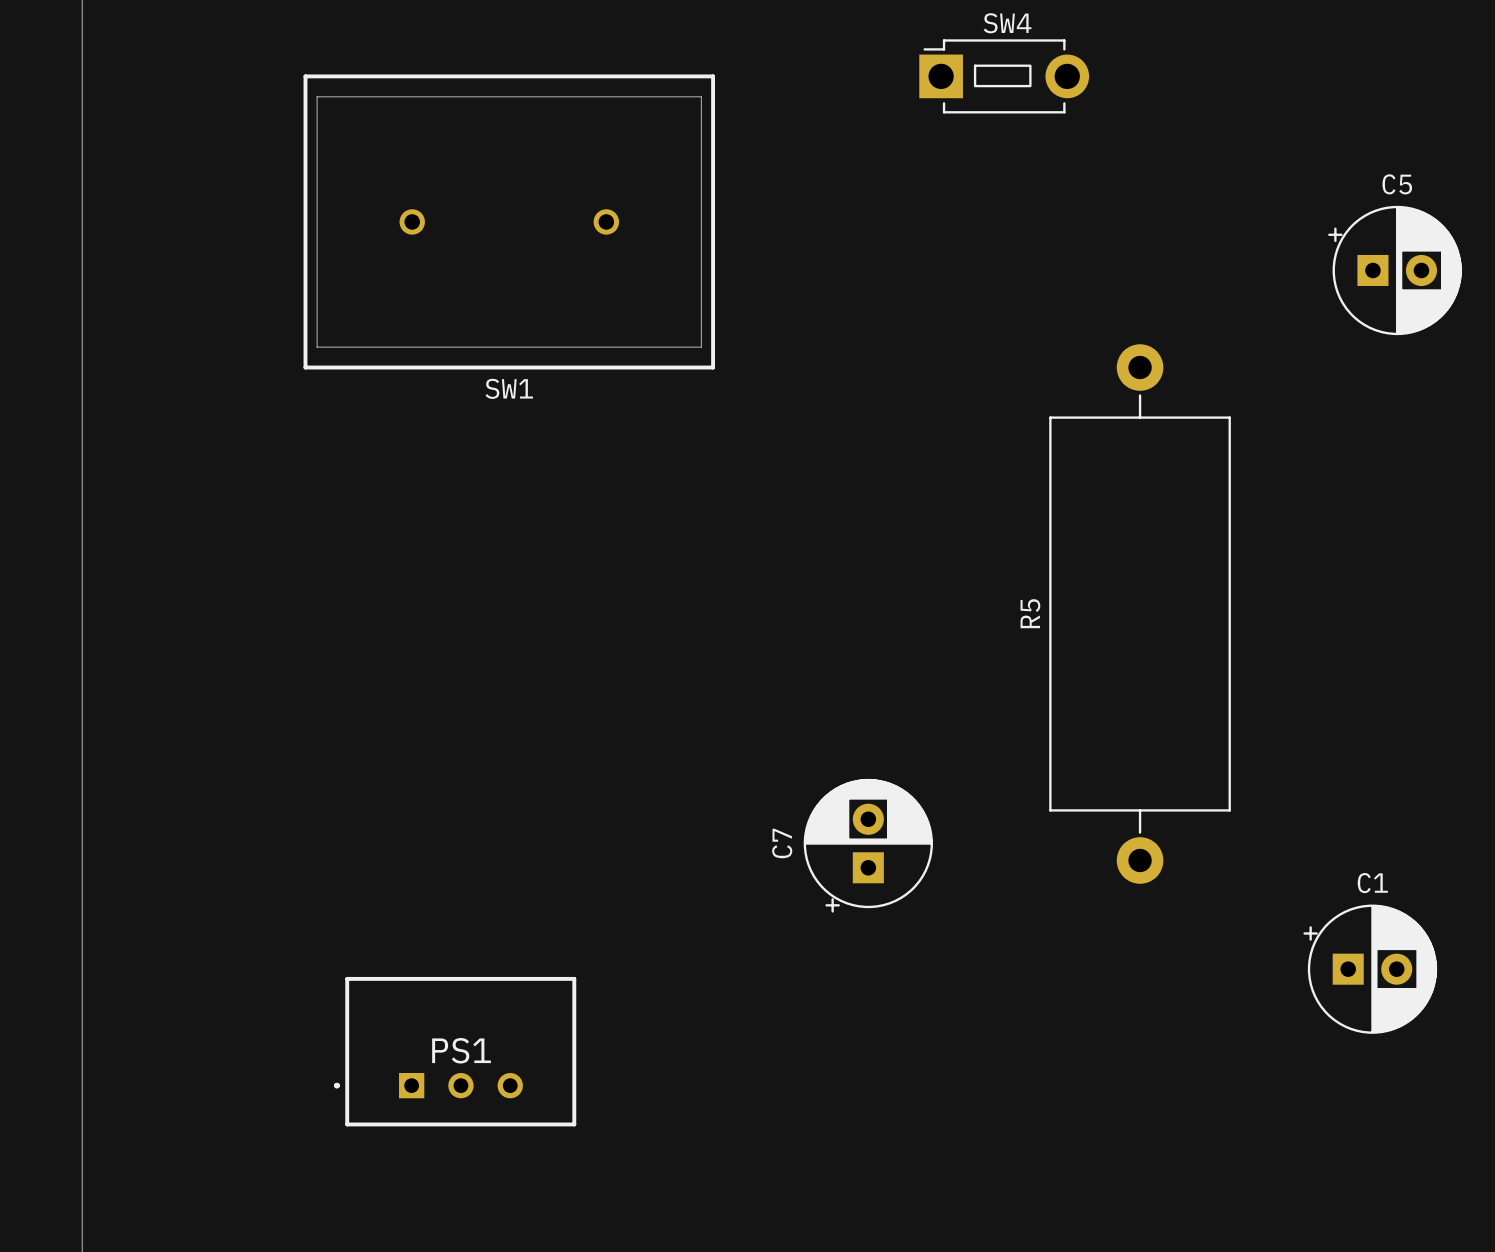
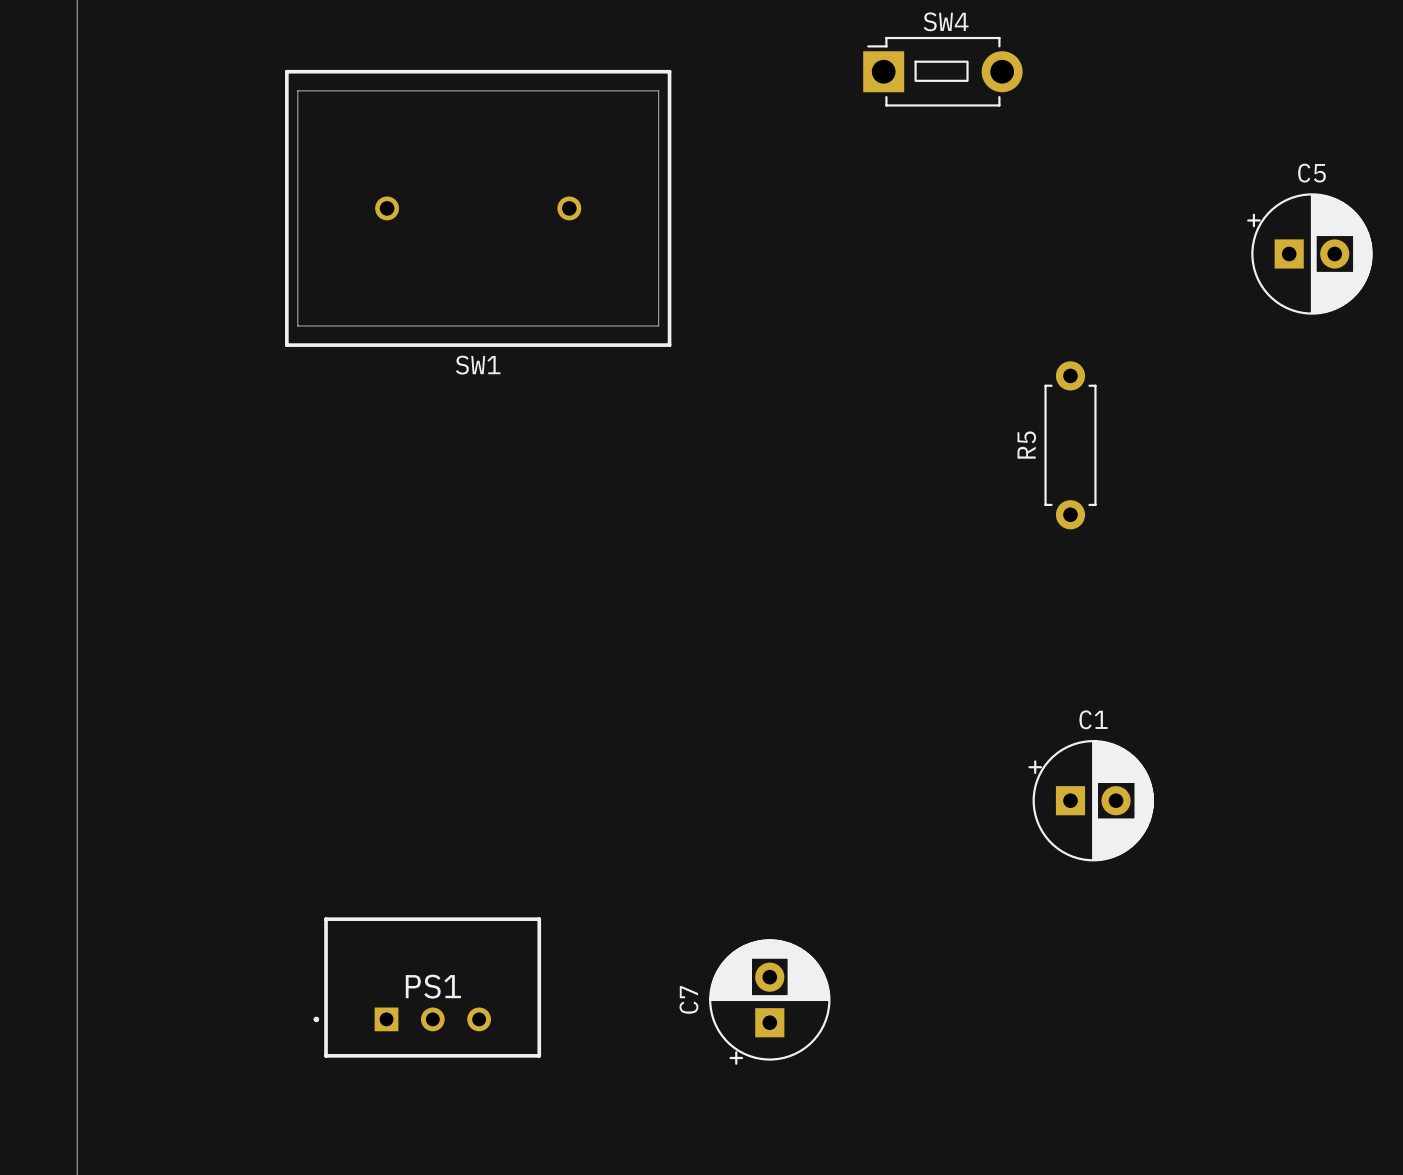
R5 footprint: [1049, 344, 1231, 884] -> [1044, 361, 1097, 530]
R5 name position: R5 (1030, 613) -> R5 (1026, 445)
C7 position: (868, 845) -> (769, 1002)
C1 position: (1370, 969) -> (1091, 800)

